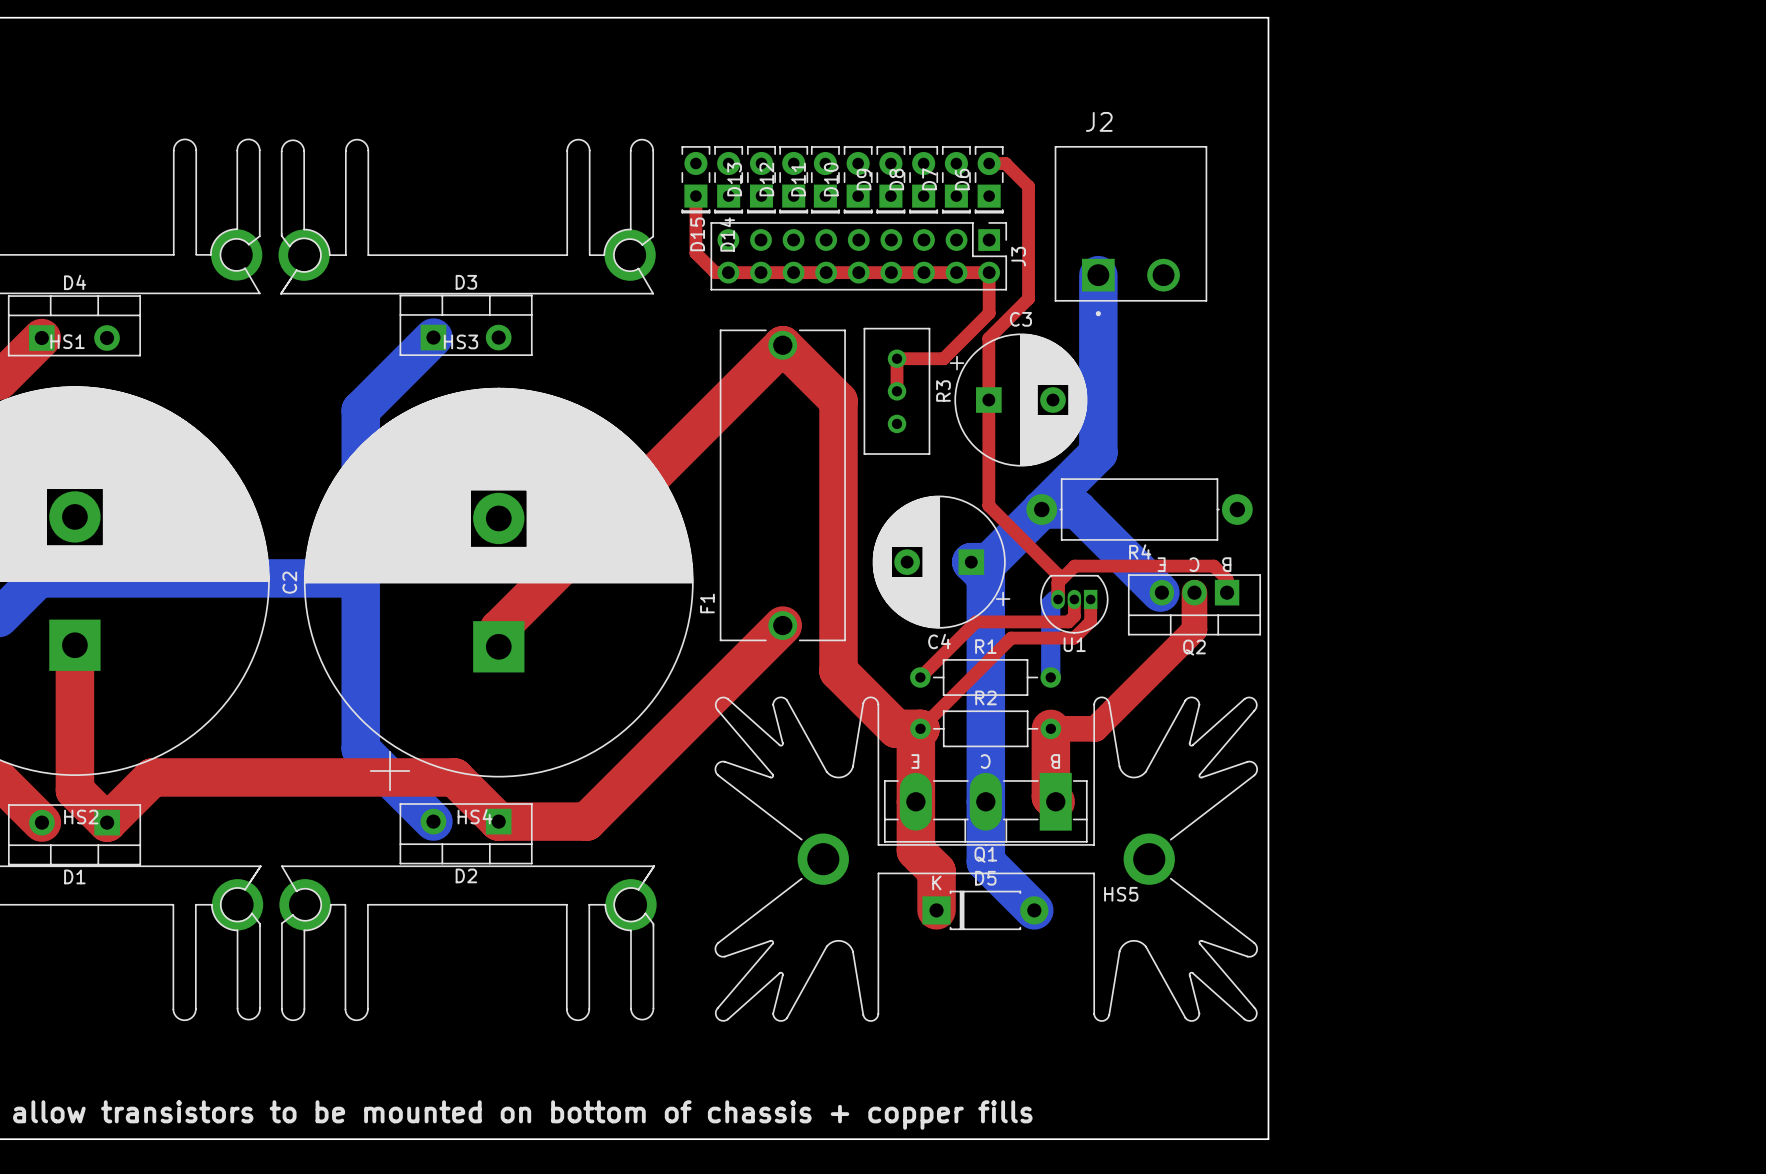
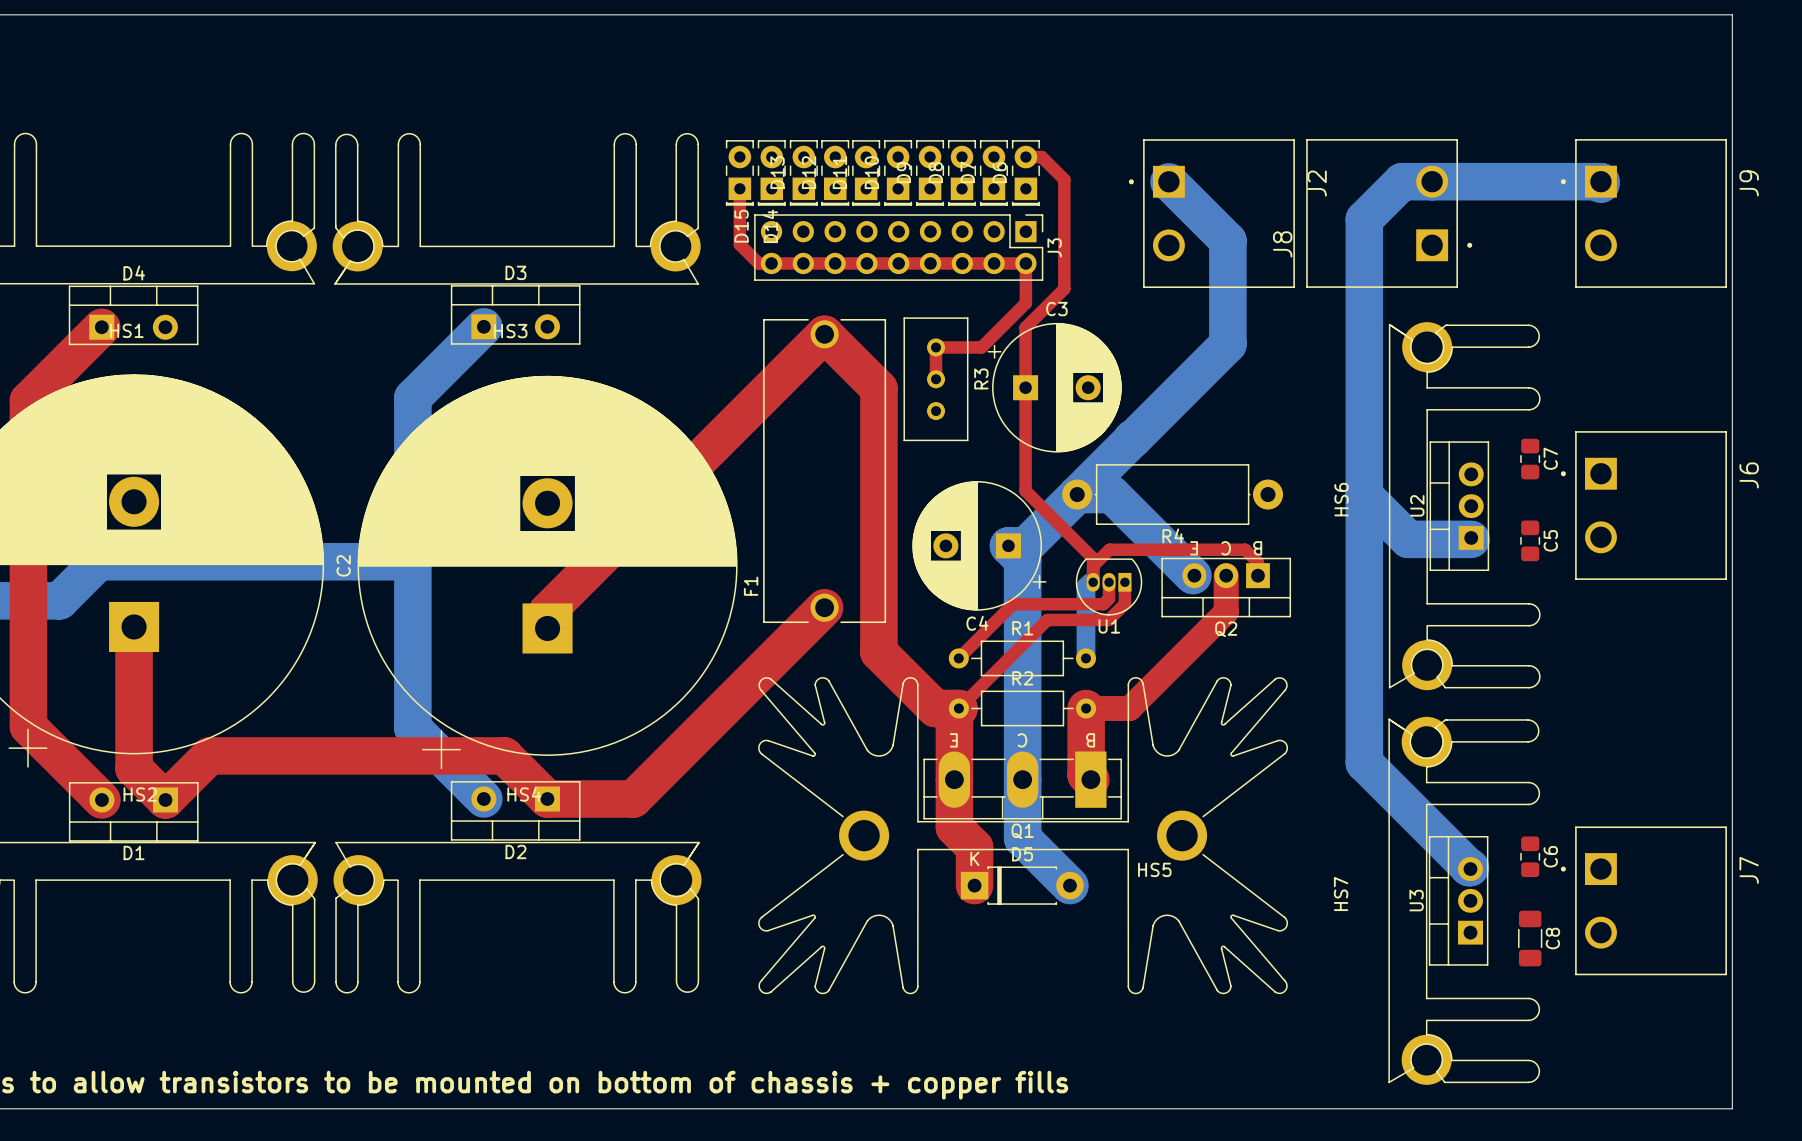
board edge: (1268, 17) (1268, 1139) -> (1298, 14) (1732, 14) (1732, 1108) (1298, 1108)
bottom track: none -> (1600, 184) (1600, 181) (1402, 181) (1364, 219) (1364, 762) (1470, 867)
J8: none -> (1389, 213)
J9: none -> (1643, 213)
J2 rotation: 0° (1130, 231) -> 90° clockwise (1211, 213)
bottom track: (1098, 275) (1098, 452) -> (1168, 181) (1227, 240) (1227, 344) (1132, 438)
C7: none -> (1530, 459)
bottom track: none -> (1364, 495) (1408, 539) (1471, 539)
J6: none -> (1643, 505)
U2: none -> (1459, 506)
HS6: none -> (1464, 506)
C5: none -> (1530, 540)
C6: none -> (1530, 856)
U3: none -> (1458, 900)
HS7: none -> (1464, 900)
J7: none -> (1643, 900)
C8: none -> (1530, 938)

